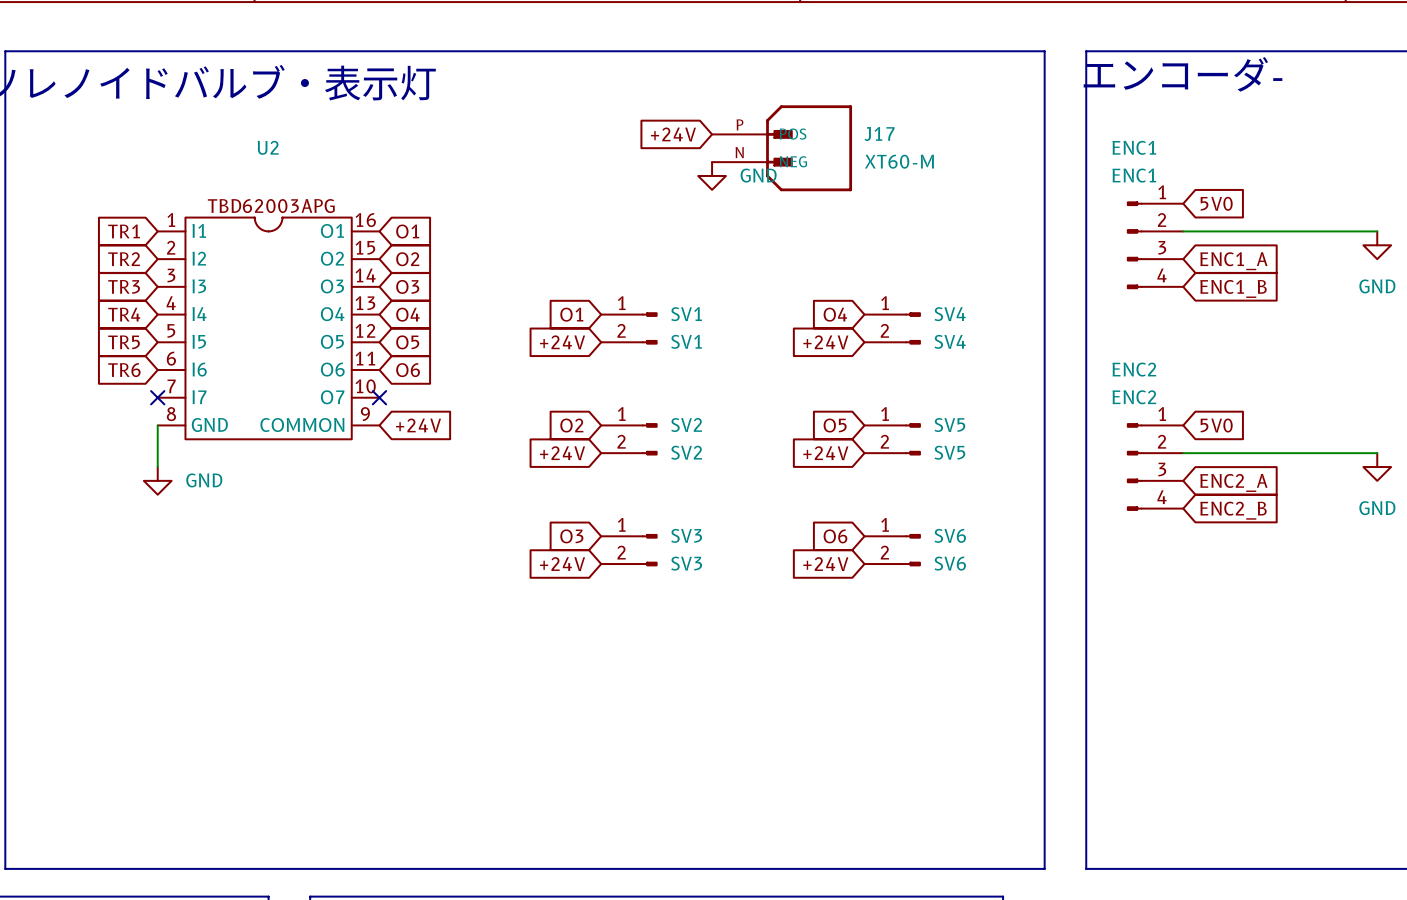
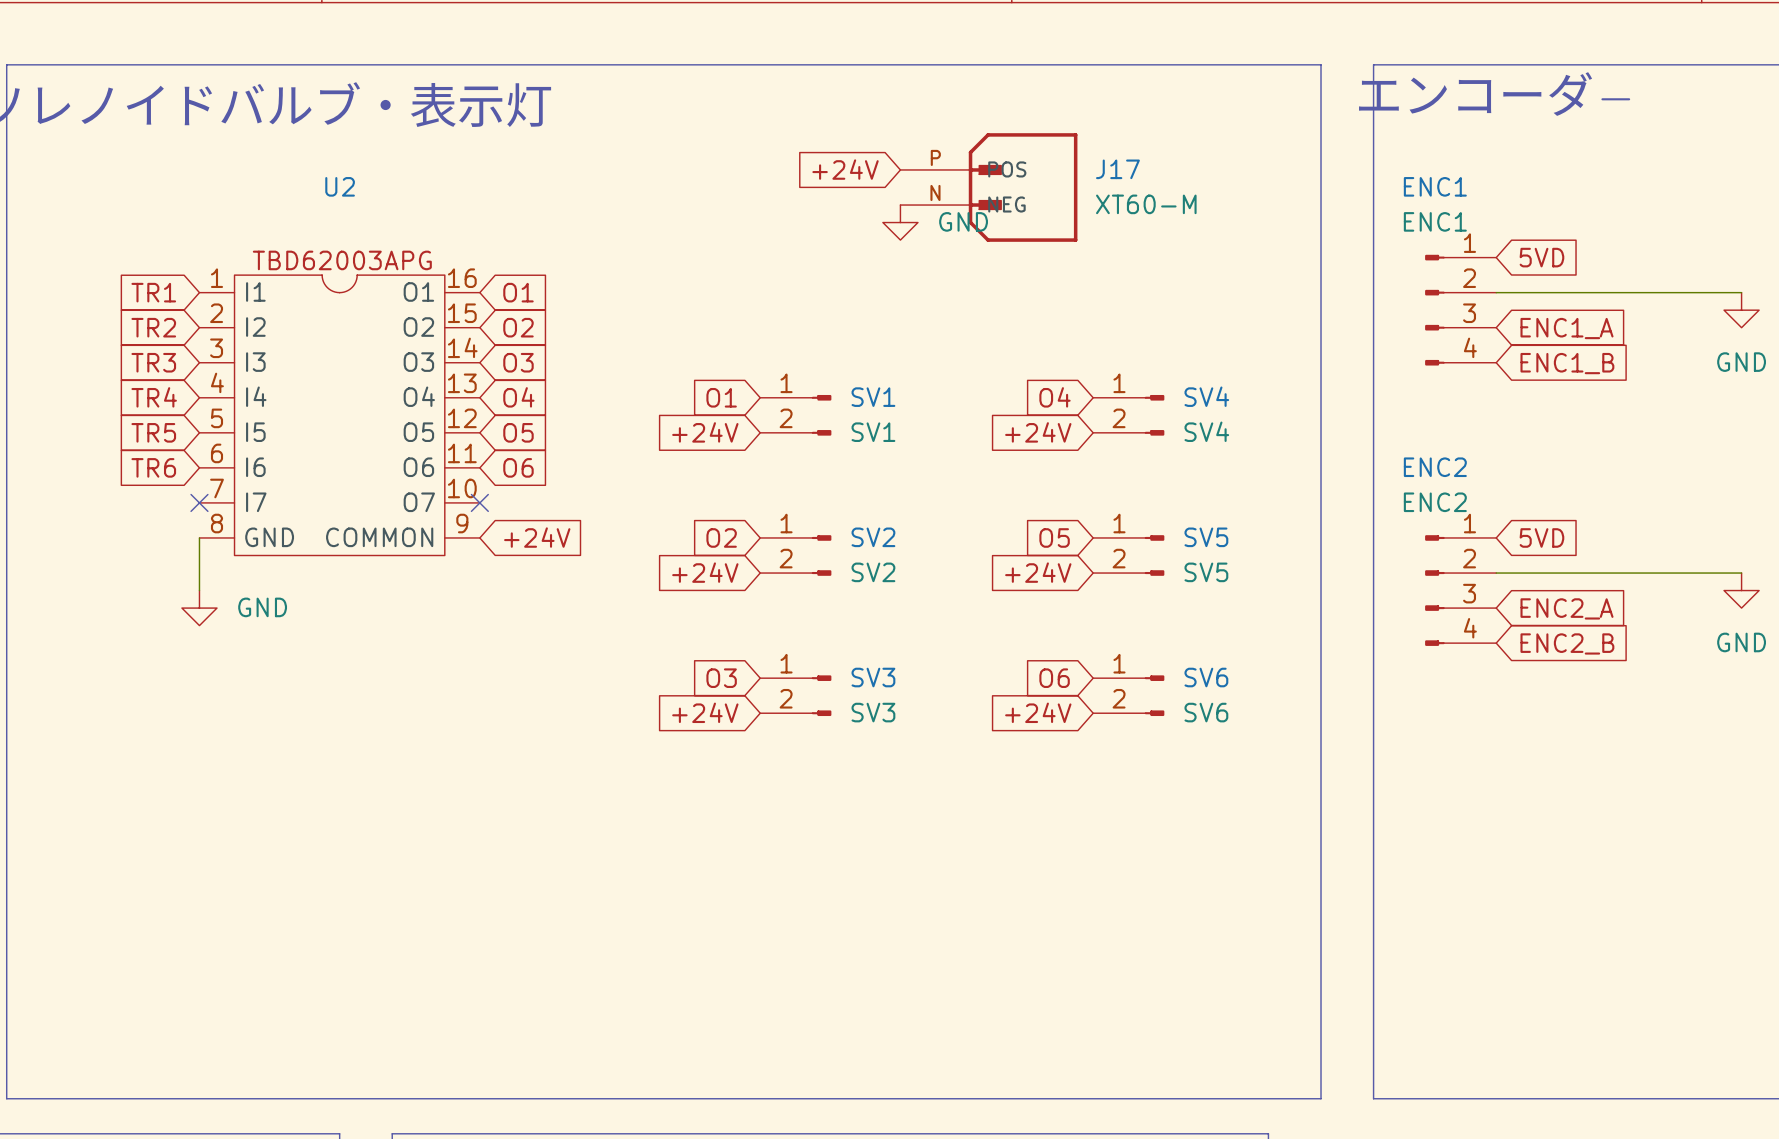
global label: 5V0 (1216, 203) -> 5VD (1541, 257)
global label: 5V0 (1216, 425) -> 5VD (1541, 537)

